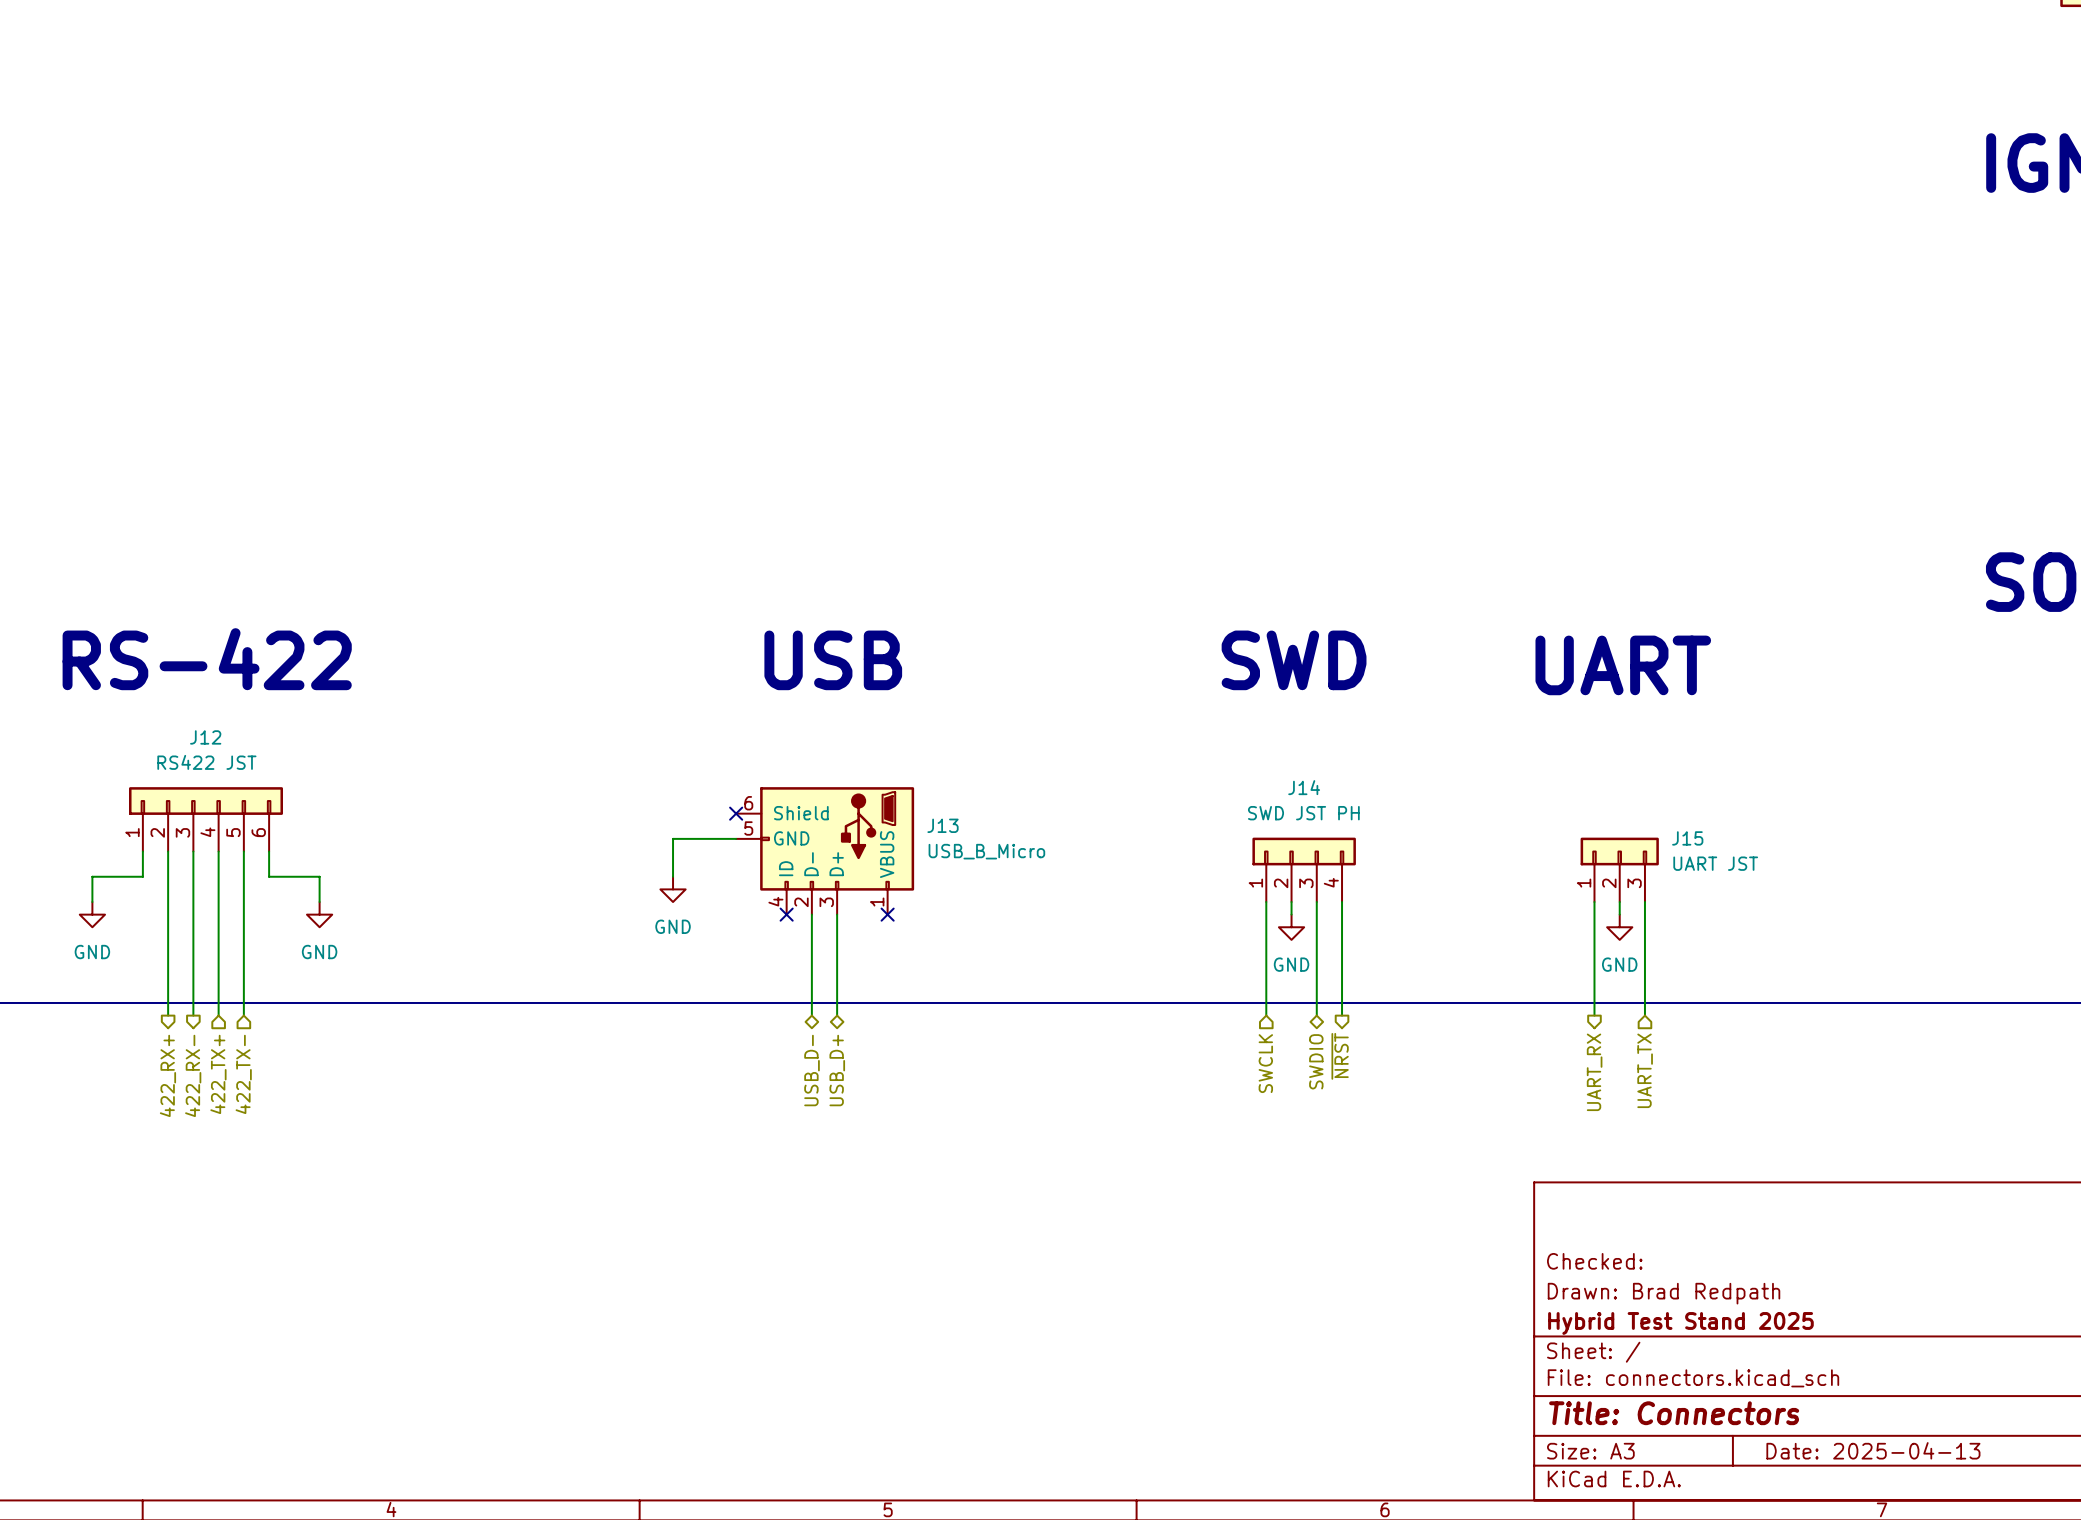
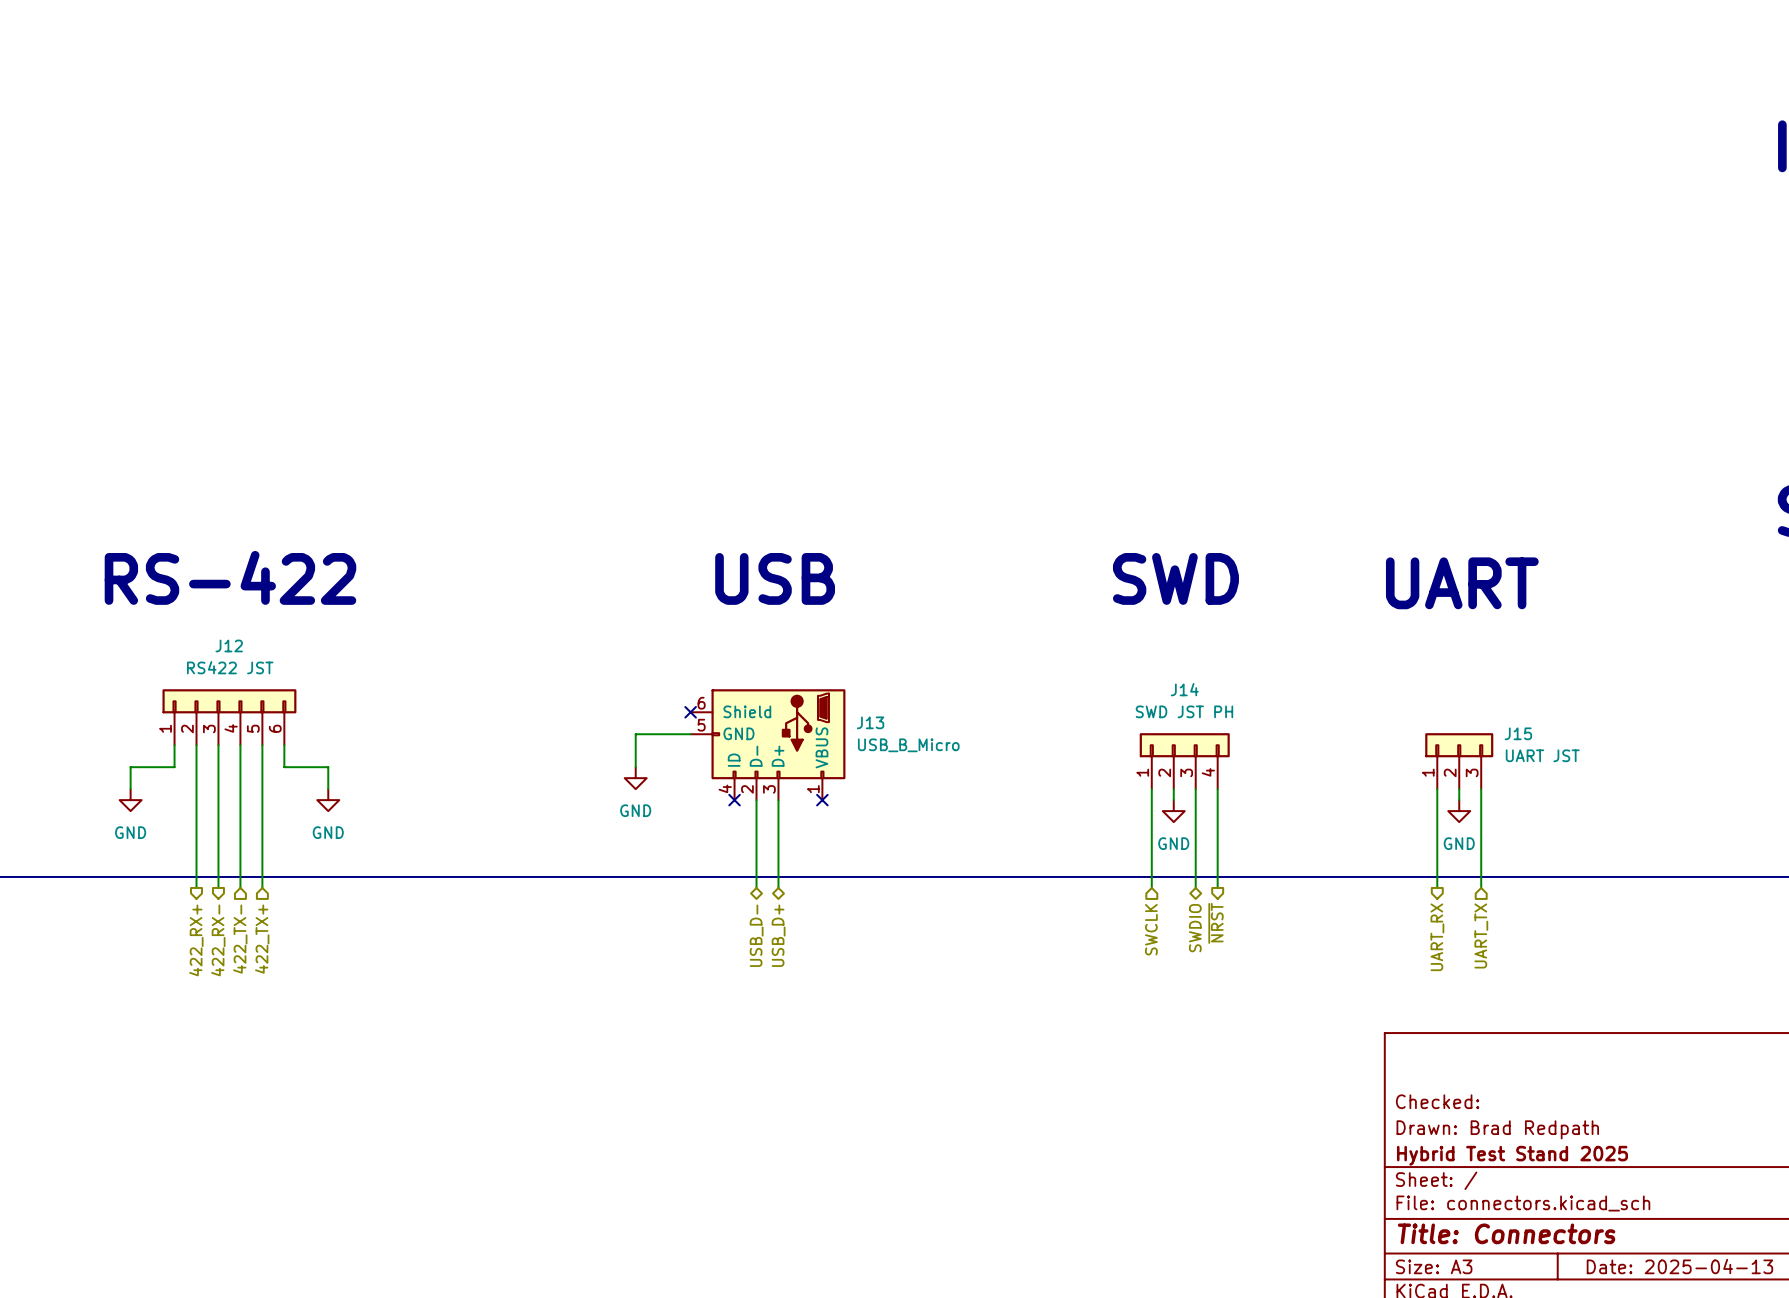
hierarchical label: 422_TX+ (218, 1074) -> 422_TX- (240, 939)
hierarchical label: 422_TX- (243, 1074) -> 422_TX+ (262, 939)

